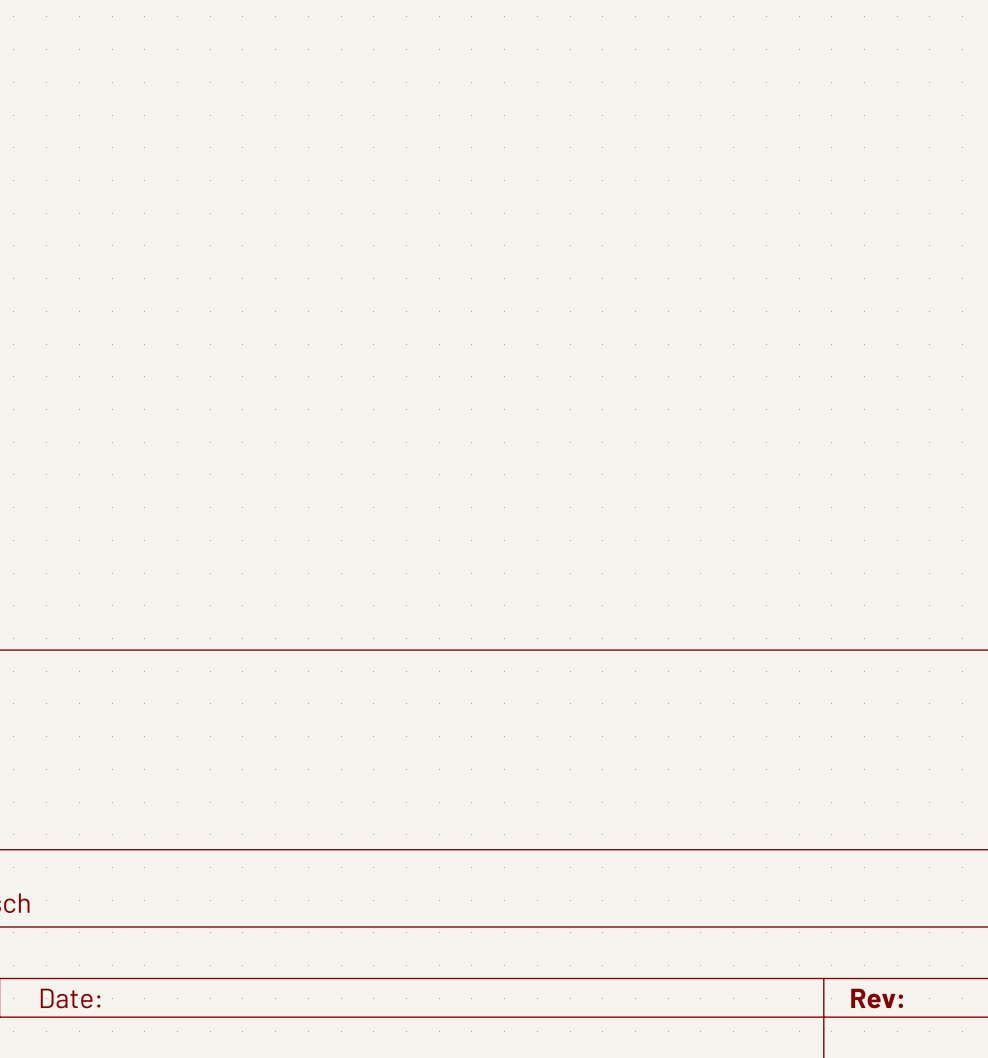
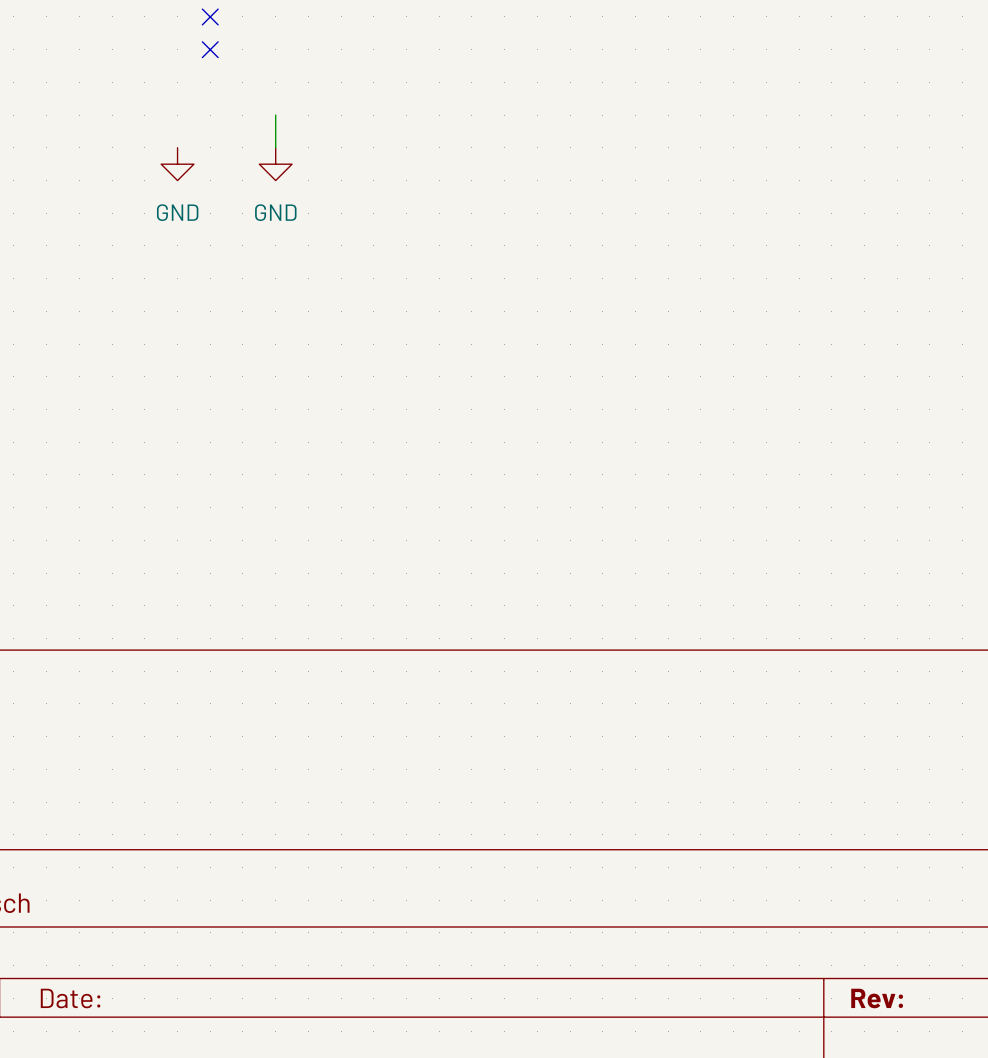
no-connect mark: none -> (210, 16)
no-connect mark: none -> (210, 49)
wire: none -> (275, 115) (275, 147)
power symbol: none -> GND (177, 164)
power symbol: none -> GND (275, 164)

